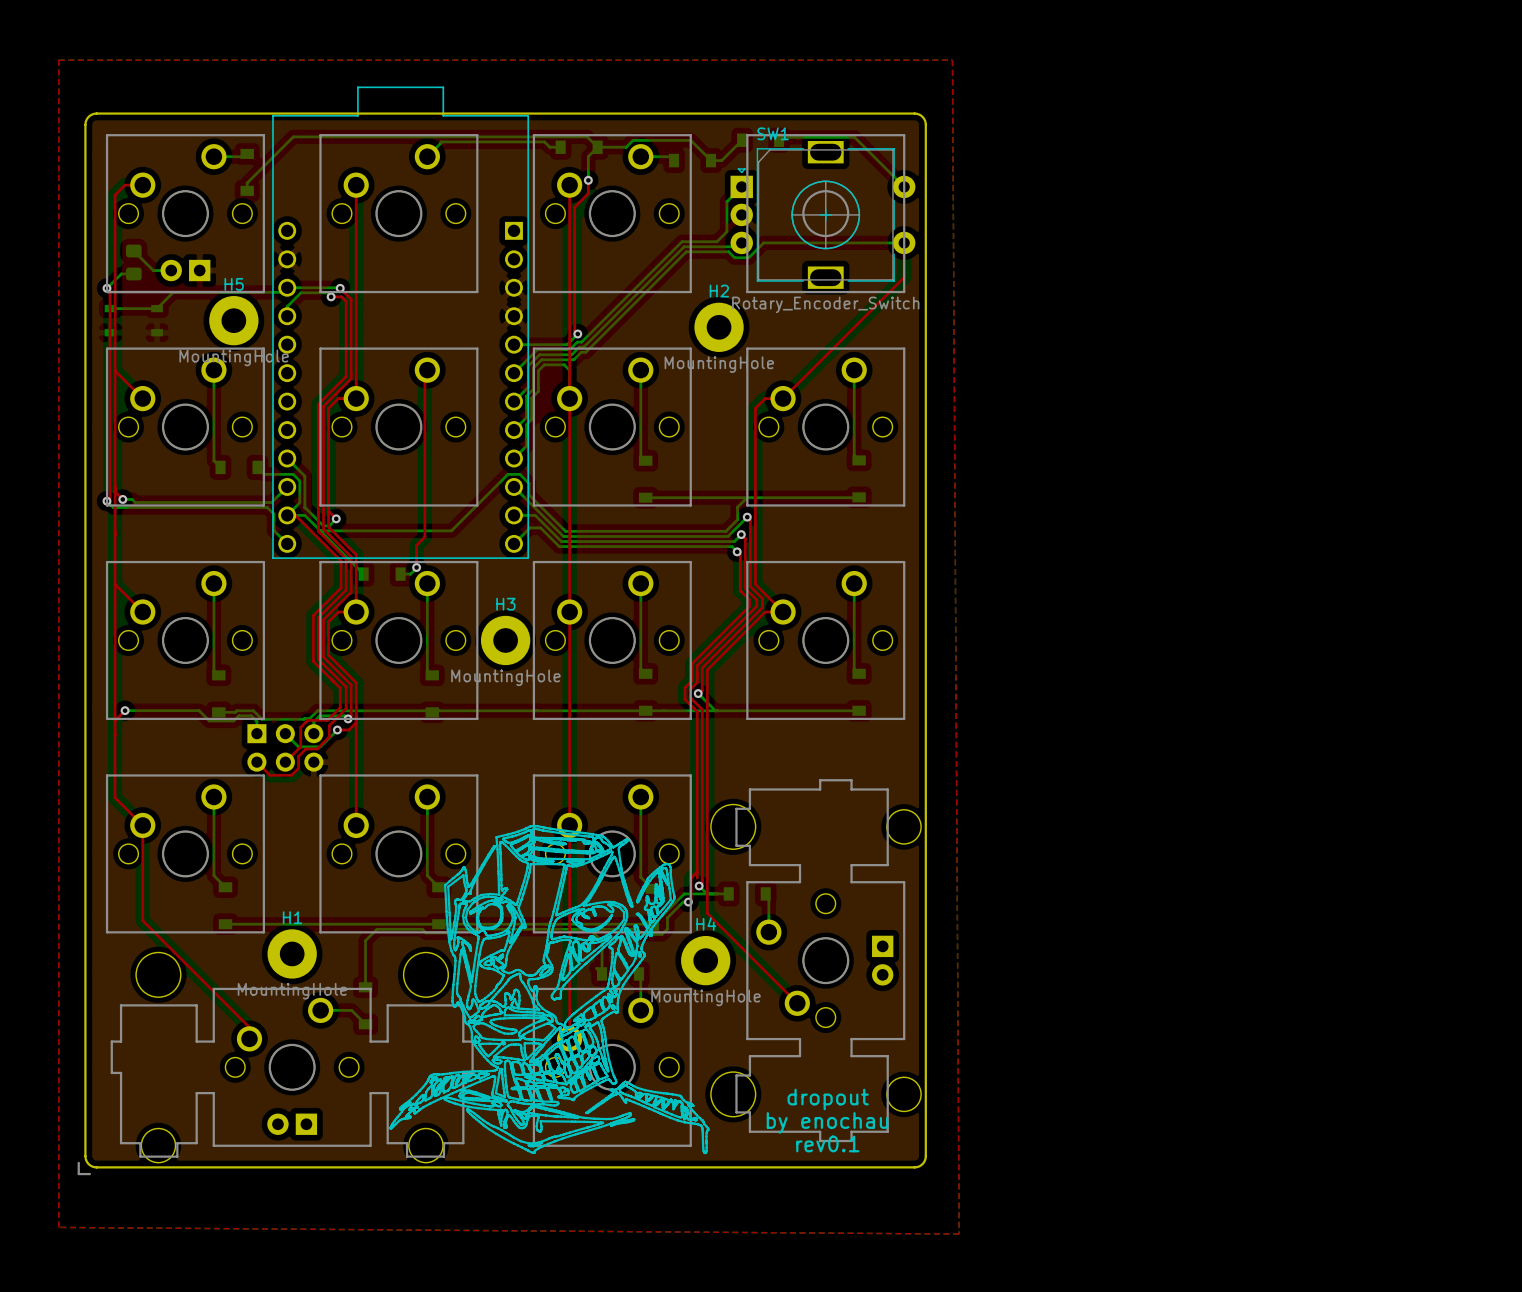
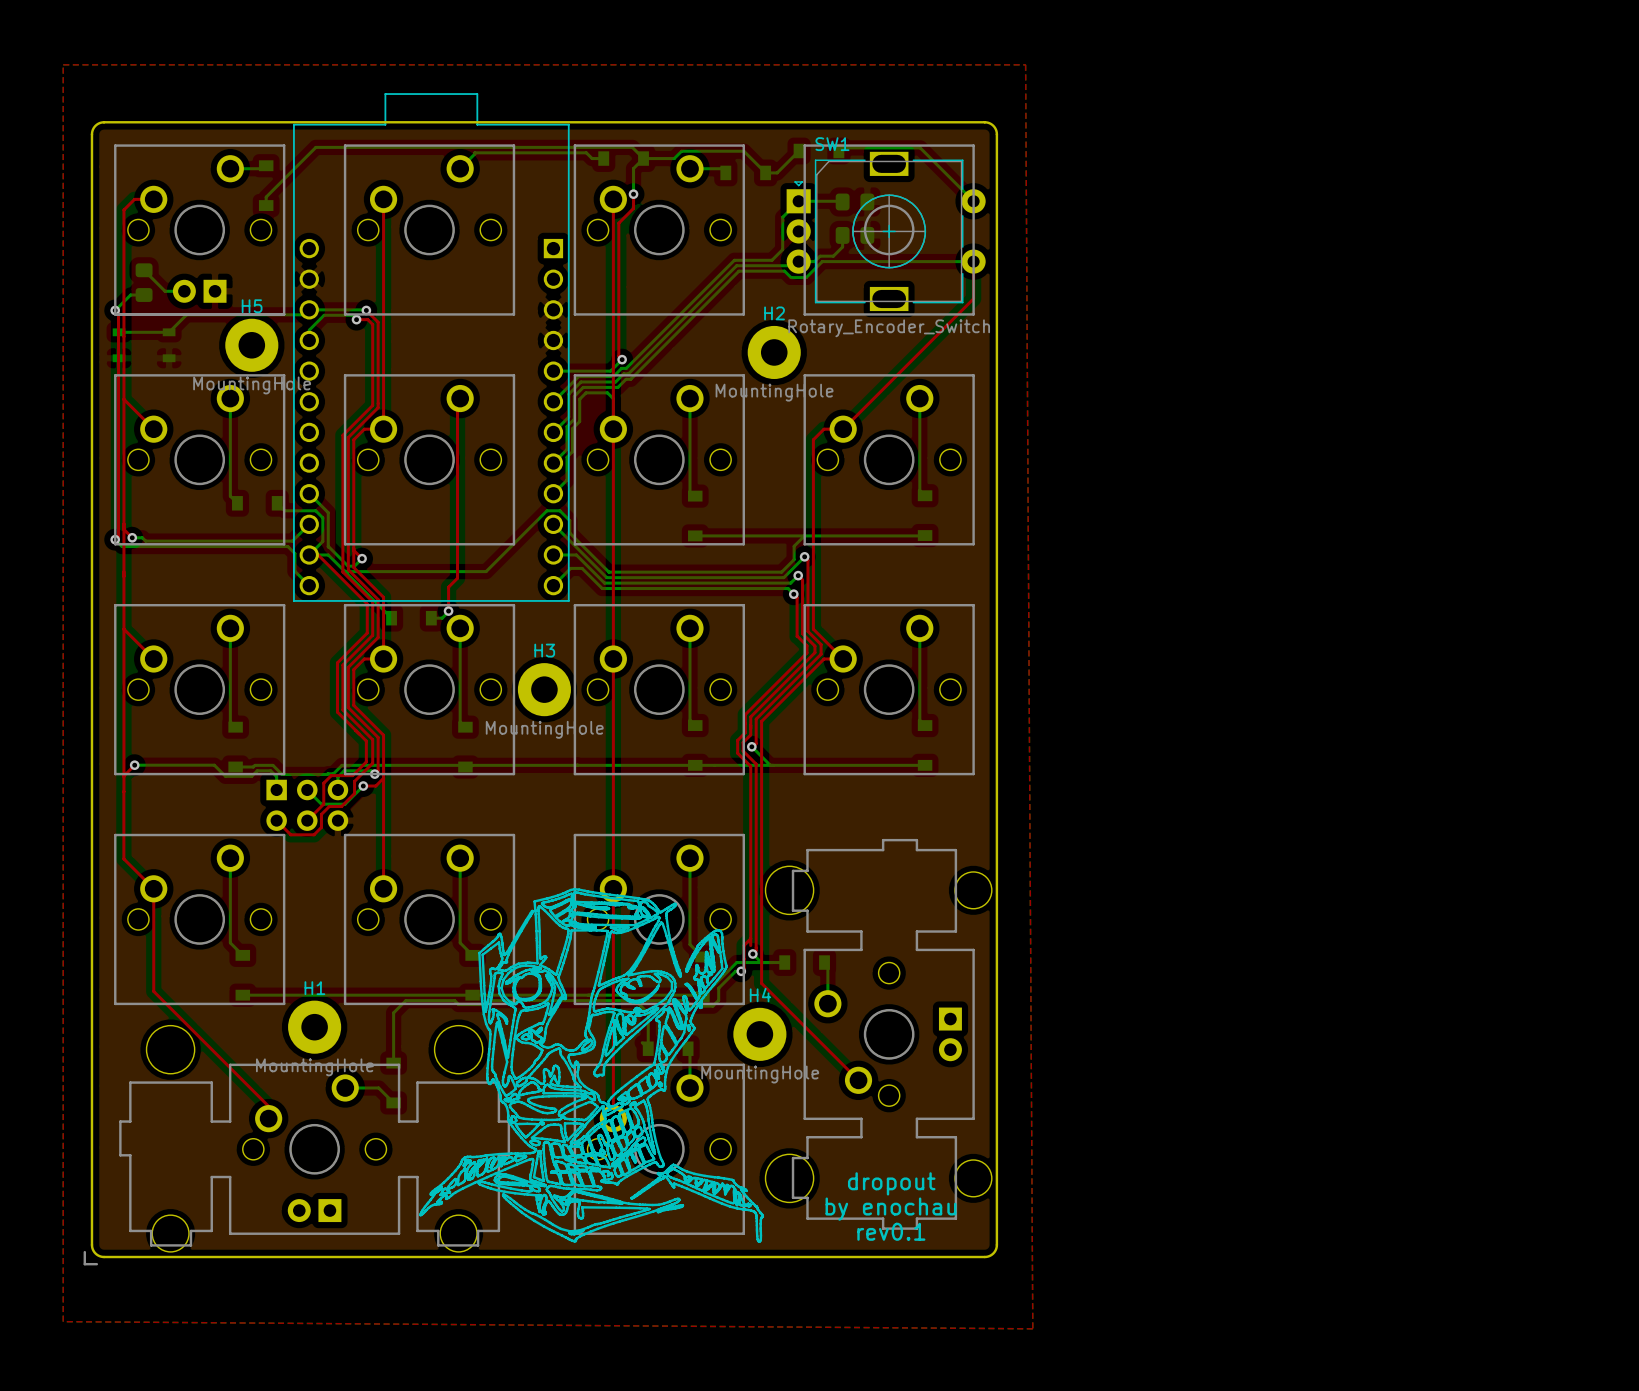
bottom track: none -> (798, 201) (842, 201)
part: none -> (854, 201)
bottom track: none -> (842, 235) (842, 246) (833, 256) (820, 256) (814, 261) (798, 261)
part: none -> (854, 235)

